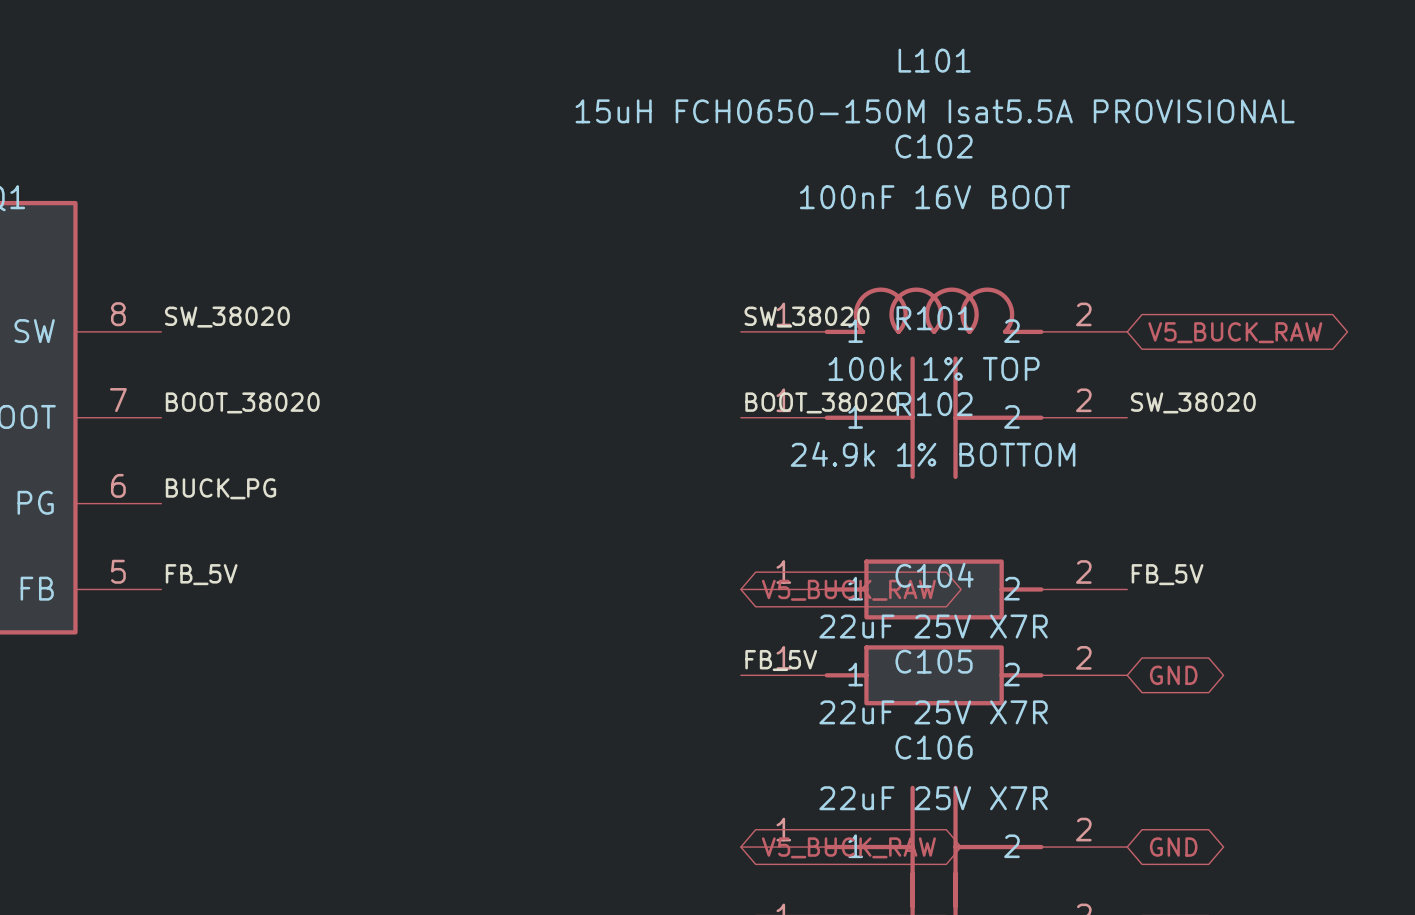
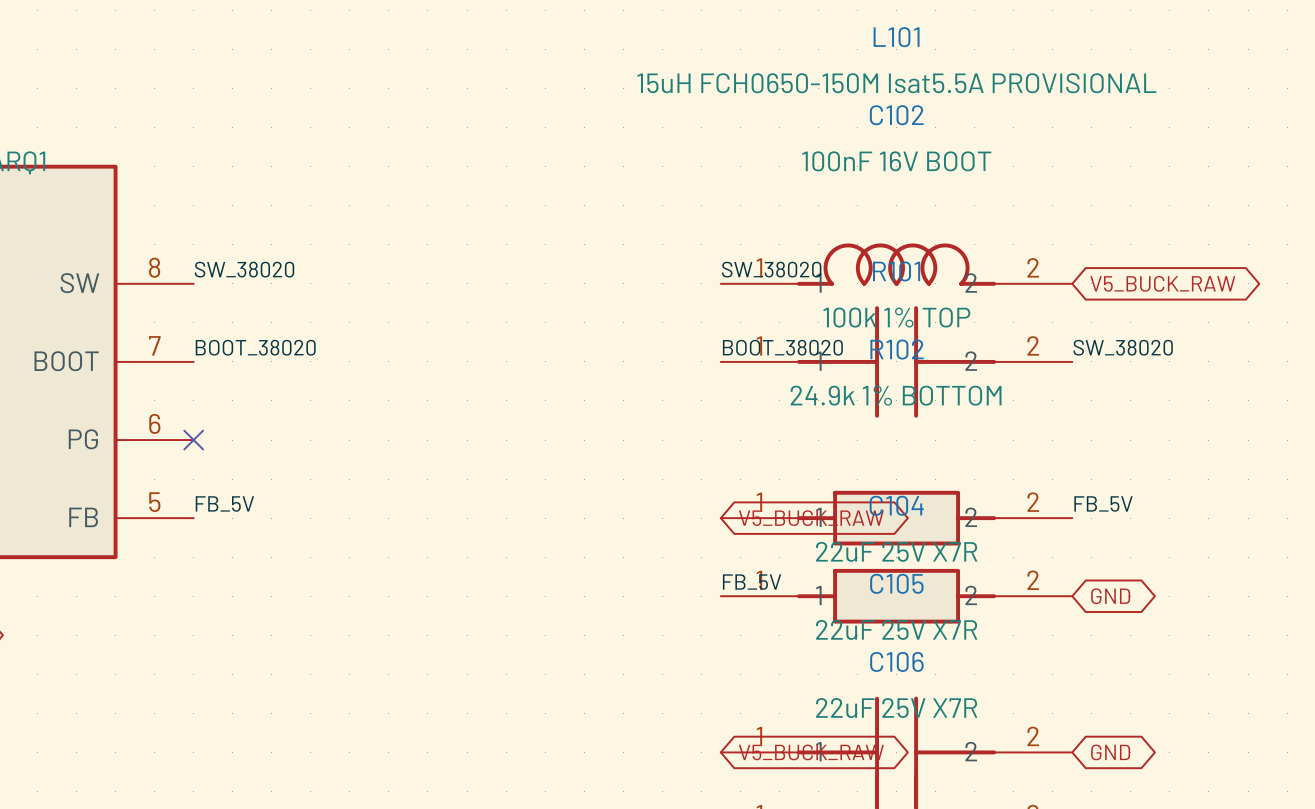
label: BUCK_PG (220, 488) -> none
no-connect mark: none -> (193, 440)

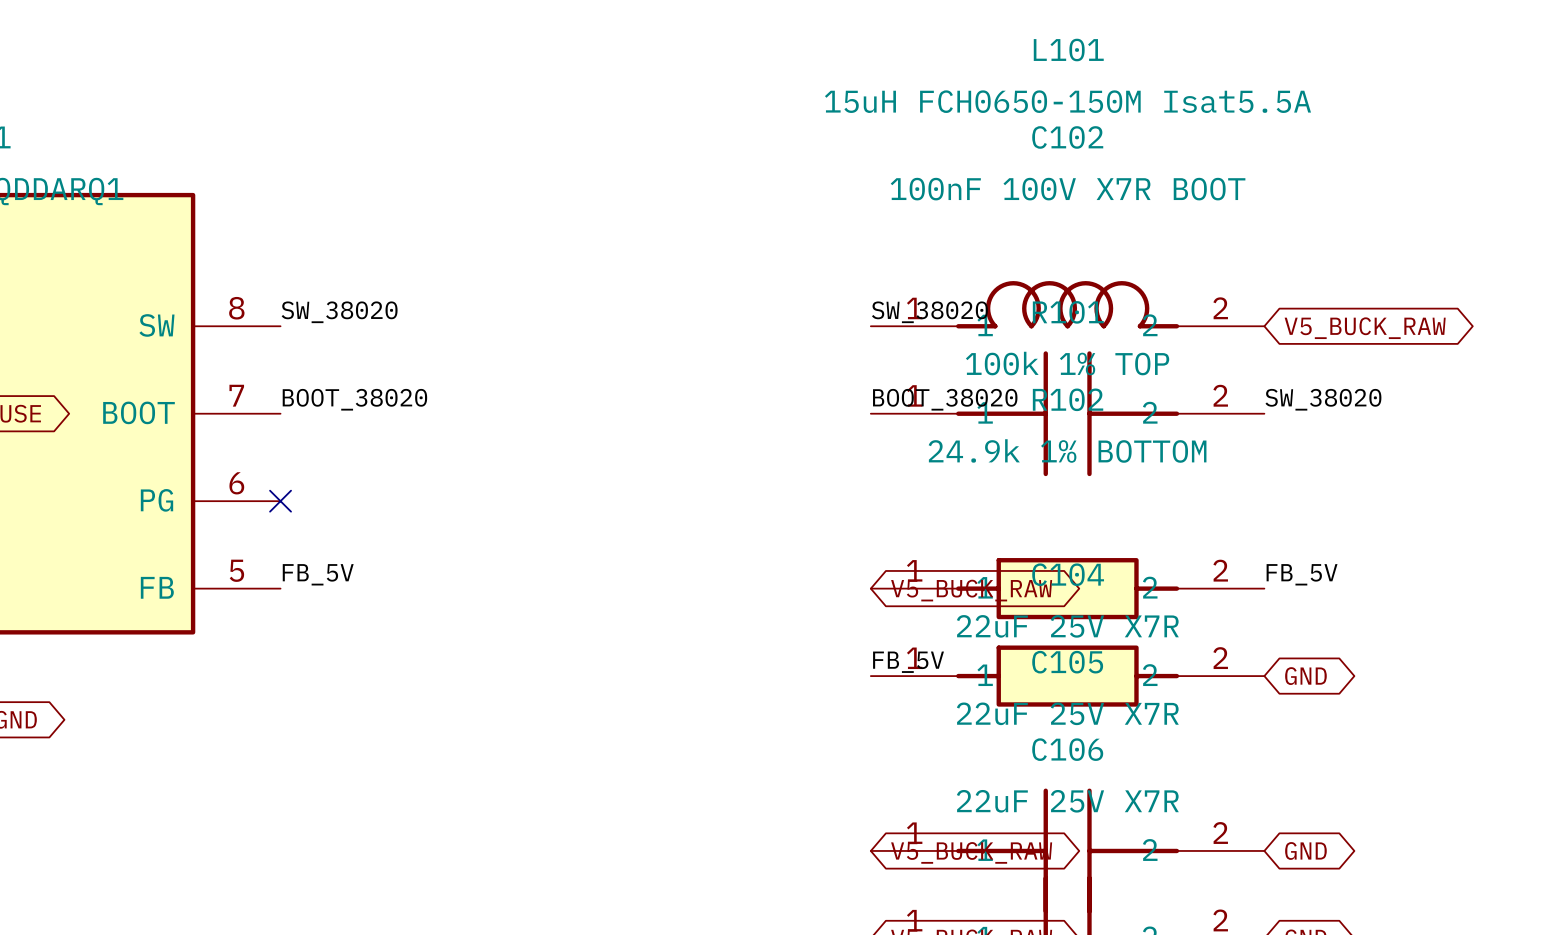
L101 value: 15uH FCH0650-150M Isat5.5A PROVISIONAL (896, 83) -> 15uH FCH0650-150M Isat5.5A (1067, 101)
C102 value: 100nF 16V BOOT (896, 161) -> 100nF 100V X7R BOOT (1068, 189)

